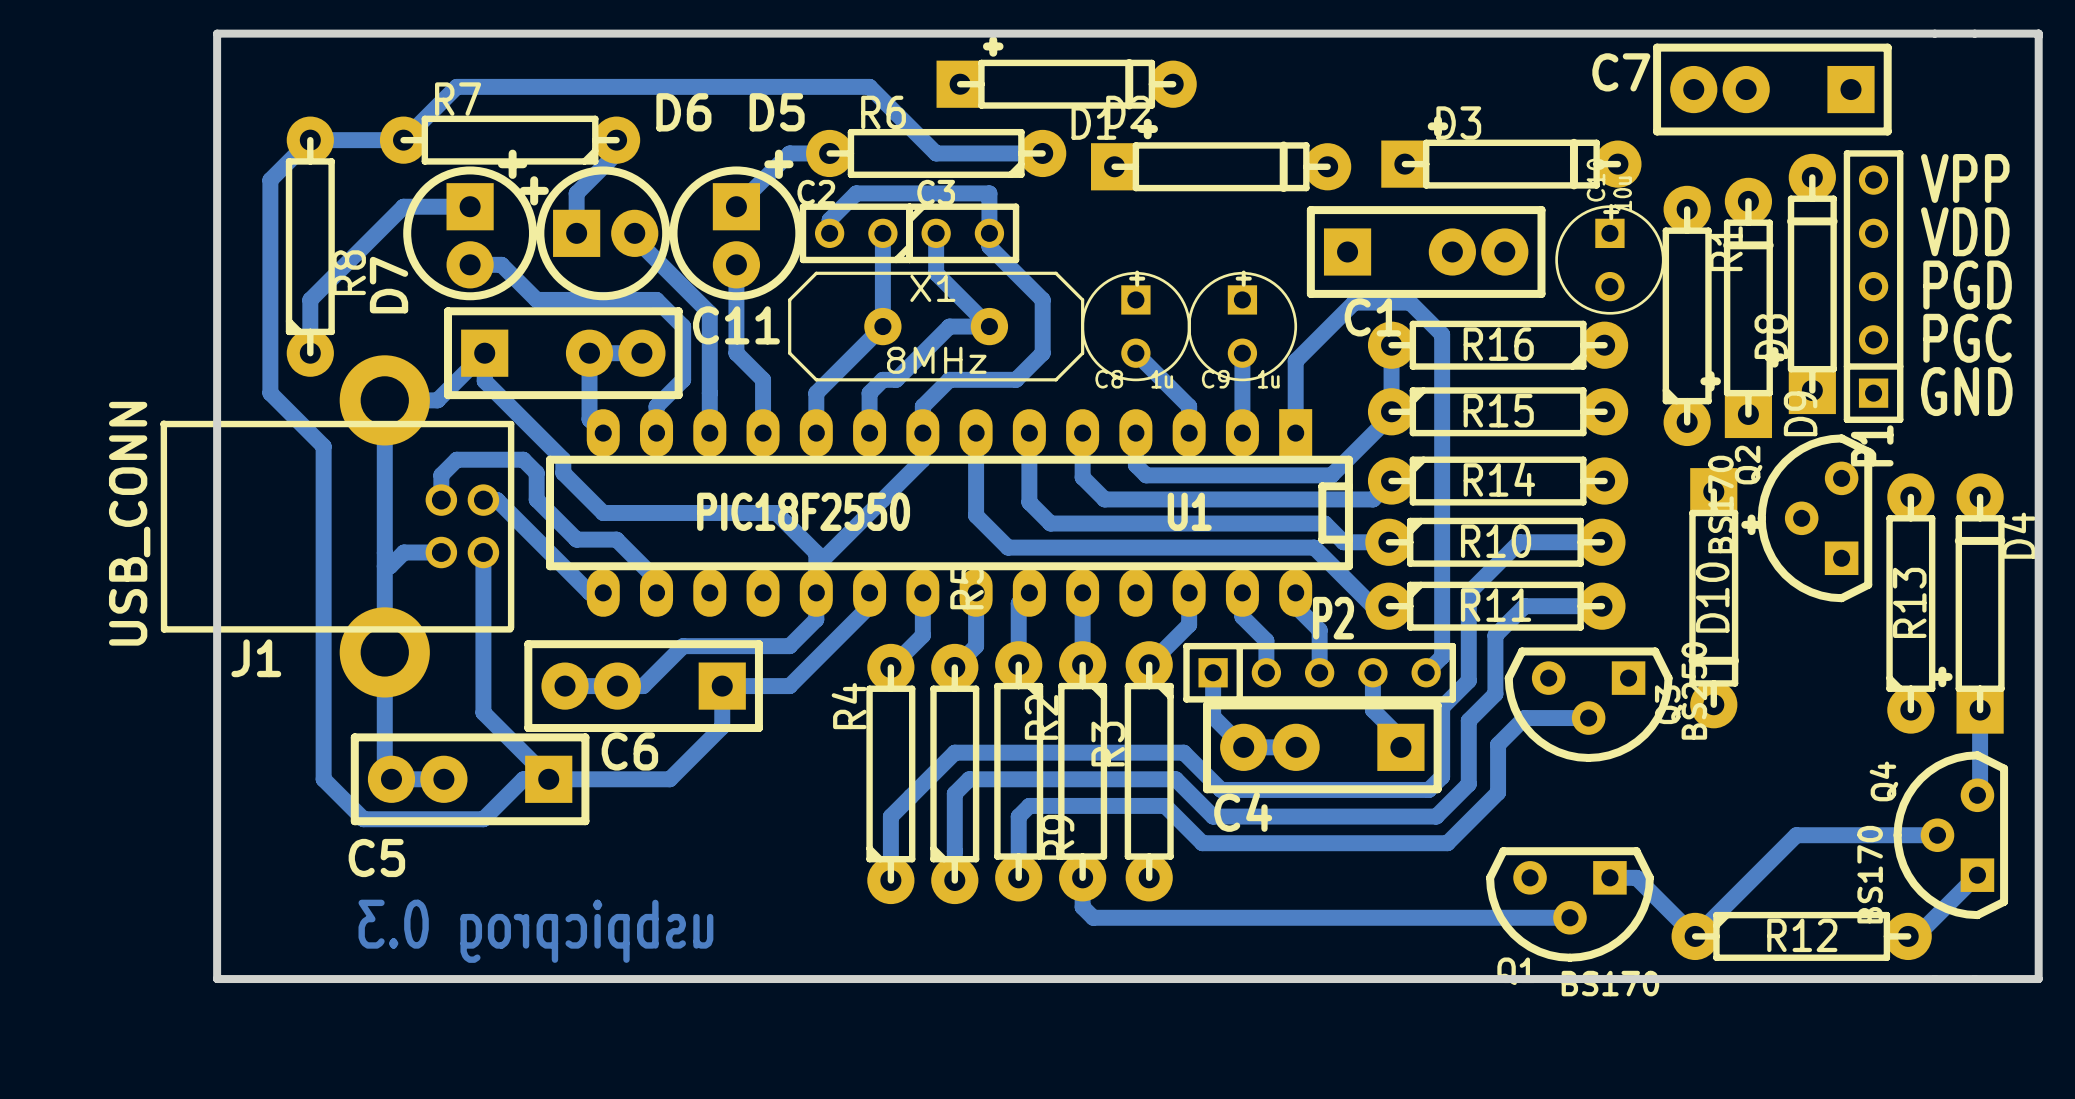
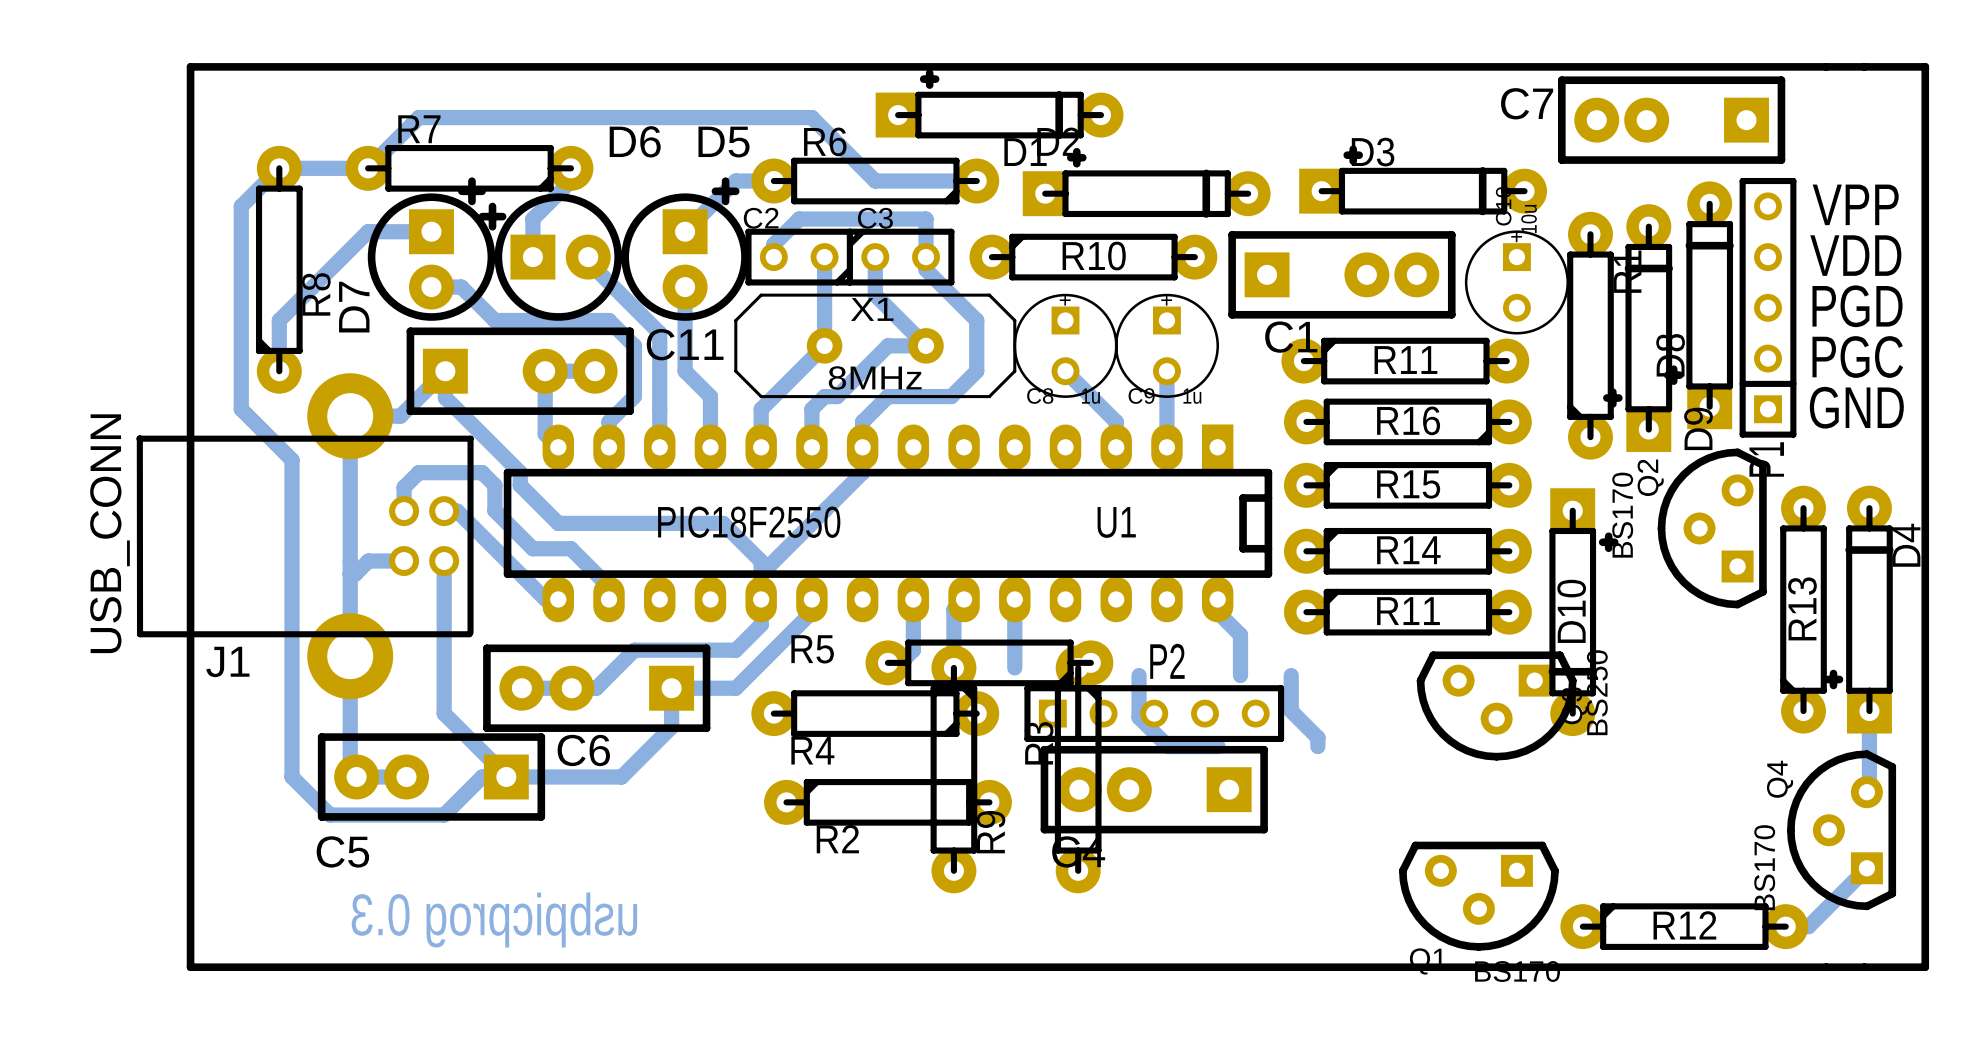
R10: none -> (1093, 257)
R11: none -> (1405, 361)
bottom track: (1391, 345) (1391, 415) (1331, 475) (1146, 475) (1135, 465) (1135, 433) -> none
R16 position: (1498, 345) -> (1407, 421)
R15 position: (1498, 411) -> (1407, 485)
bottom track: (976, 433) (976, 515) (1008, 547) (1314, 547) (1372, 606) (1388, 606) -> none
bottom track: (1029, 433) (1029, 502) (1050, 523) (1324, 523) (1343, 542) (1388, 542) -> none
bottom track: (1082, 433) (1082, 477) (1104, 499) (1373, 499) (1391, 481) -> none
bottom track: (1295, 433) (1295, 361) (1354, 302) (1410, 302) (1442, 334) (1442, 656) (1426, 672) -> none
R14: (1498, 481) -> none
R10 name: R10 (1496, 541) -> R14 (1408, 550)
bottom track: (1601, 542) (1519, 542) (1468, 592) (1468, 680) (1442, 707) (1442, 776) (1428, 789) (1221, 789) (1183, 752) (954, 752) (890, 816) (890, 880) -> none
bottom track: (922, 592) (922, 635) (890, 667) -> none
bottom track: (1189, 592) (1189, 624) (1149, 664) -> none
bottom track: (1242, 592) (1242, 616) (1266, 640) (1266, 672) -> none
D10 position: (1725, 598) -> (1583, 612)
bottom track: (1601, 606) (1524, 606) (1495, 635) (1495, 694) (1468, 720) (1468, 784) (1436, 816) (1213, 816) (1175, 779) (969, 779) (954, 793) (954, 880) -> none
P2 position: (1319, 672) -> (1154, 713)
bottom track: (1588, 718) (1524, 718) (1498, 744) (1498, 792) (1447, 843) (1202, 843) (1165, 805) (1029, 805) (1018, 816) (1018, 877) -> none
C4 position: (1322, 747) -> (1154, 789)
R2 rotation: 0° (1082, 771) -> 90° counterclockwise (887, 802)
R4 rotation: 0° (890, 773) -> 90° counterclockwise (875, 713)
R5 rotation: 0° (954, 773) -> 90° counterclockwise (989, 662)
bottom track: (1937, 835) (1796, 835) (1695, 936) (1636, 877) (1609, 877) -> none
bottom track: (1082, 877) (1082, 907) (1093, 917) (1569, 917) -> none
R12 position: (1801, 936) -> (1684, 926)

